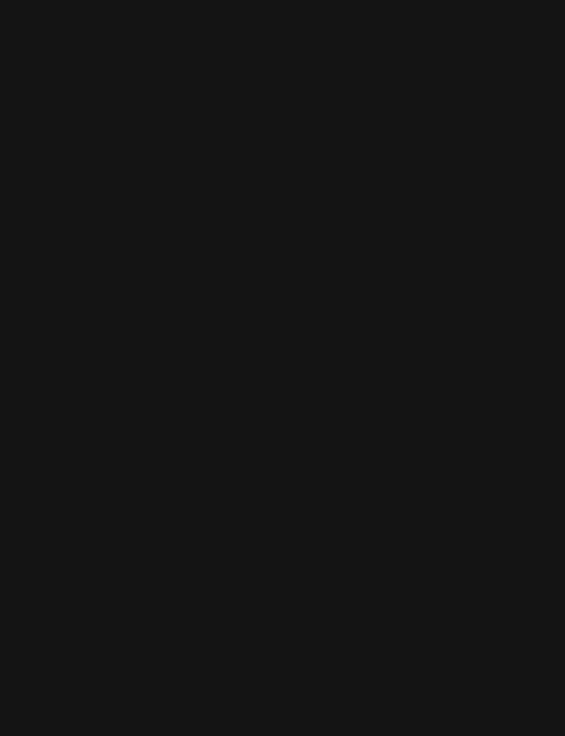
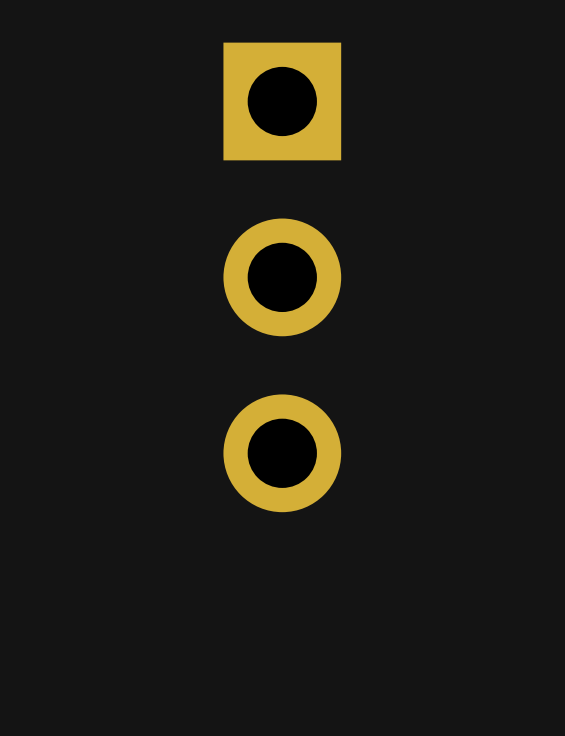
part: none -> (282, 277)

